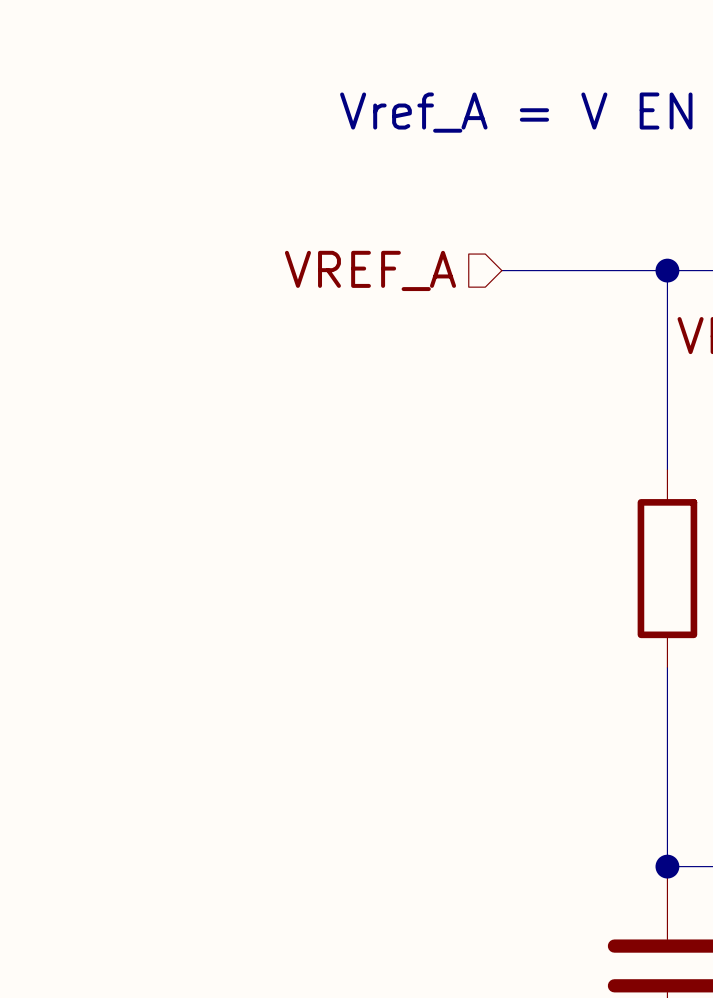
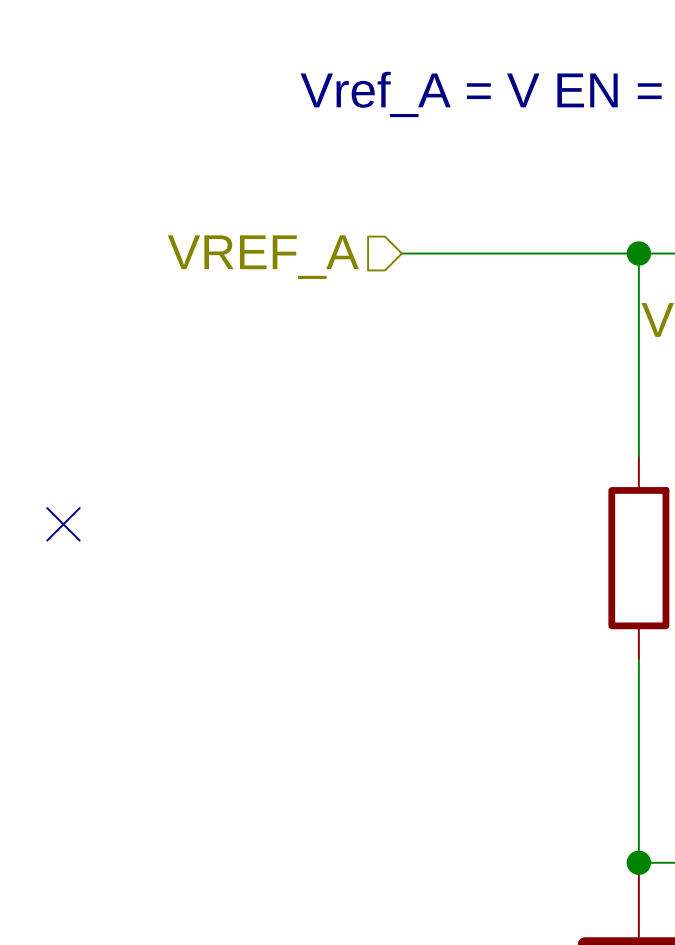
hierarchical label position: VREF_A (370, 270) -> VREF_A (263, 257)
wire: none -> (401, 253) (469, 253)
no-connect mark: none -> (63, 524)

